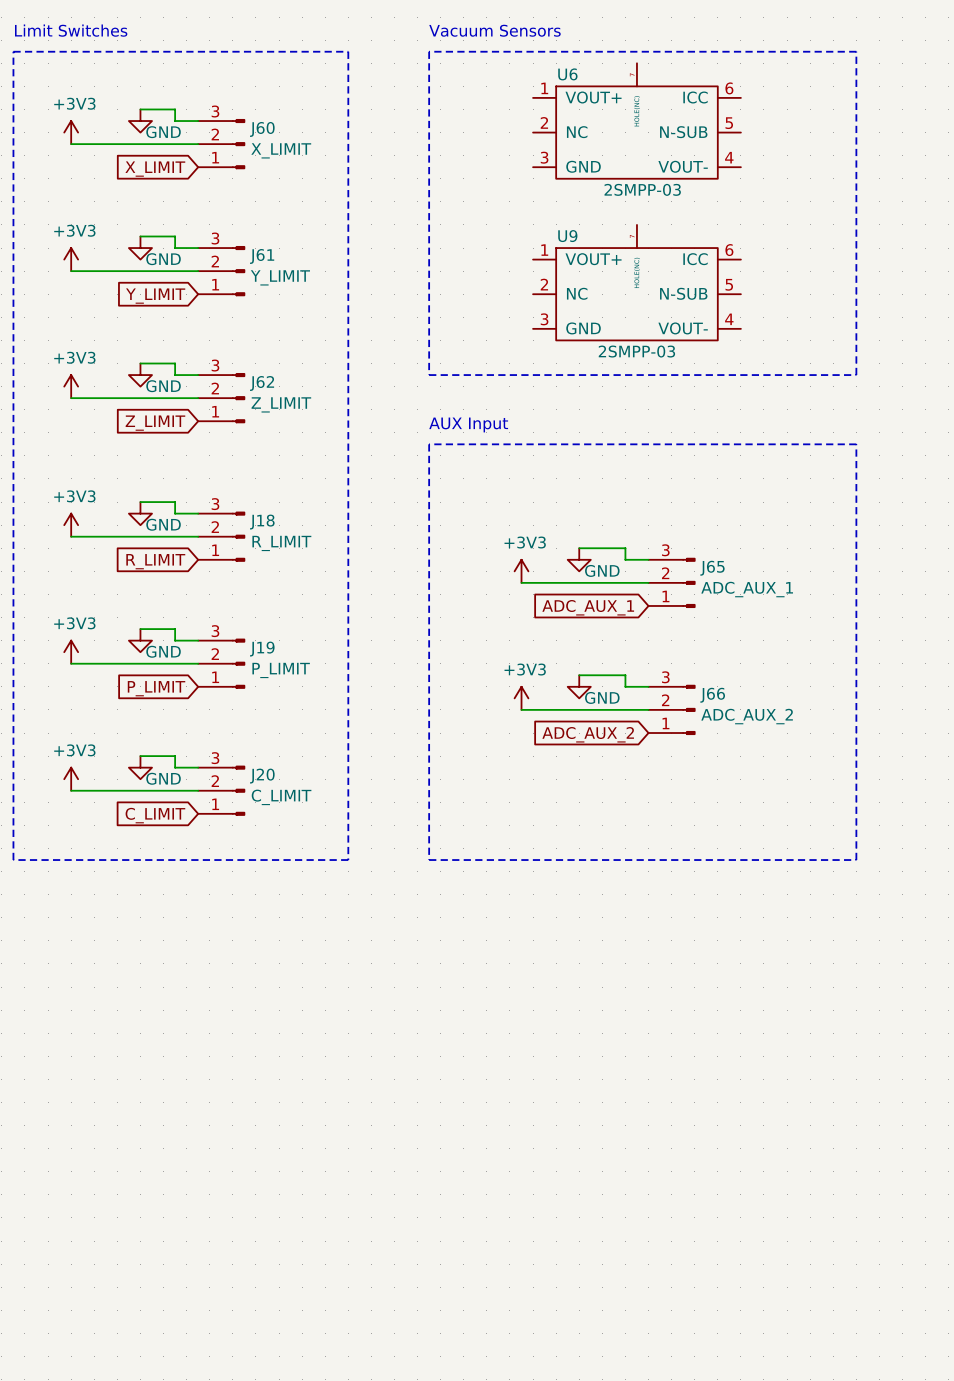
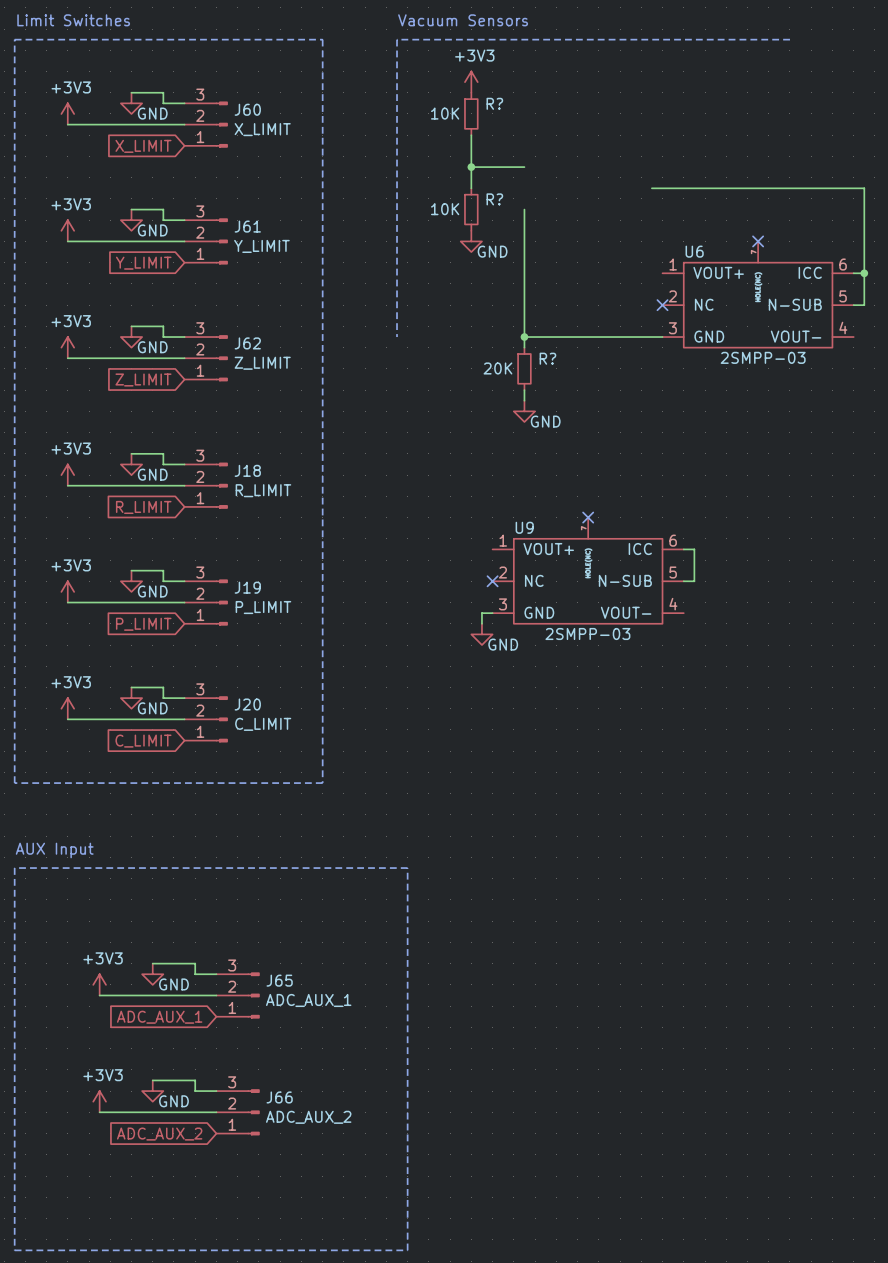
line: (856, 51) (856, 375) (429, 375) -> none
power symbol: none -> +3V3 (471, 82)
U6 position: (636, 121) -> (758, 294)
R?: none -> 10K (471, 113)
wire: none -> (471, 135) (471, 188)
wire: none -> (471, 167) (524, 167)
junction: none -> (471, 167)
wire: none -> (651, 188) (864, 188) (864, 305) (853, 305)
R?: none -> 10K (471, 209)
wire: none -> (524, 209) (524, 347)
power symbol: none -> GND (471, 241)
no-connect mark: none -> (758, 241)
U9 position: (636, 282) -> (588, 570)
wire: none -> (853, 273) (864, 273)
junction: none -> (864, 273)
no-connect mark: none -> (662, 305)
junction: none -> (524, 337)
R?: none -> 20K (524, 368)
text: AUX Input (468, 424) -> none
wire: none -> (524, 390) (524, 400)
line: (429, 444) (429, 860) (856, 860) (856, 444) (429, 444) -> none
wire: (579, 548) (625, 548) (625, 559) (648, 559) -> none
power symbol position: GND (579, 559) -> GND (524, 411)
power symbol: +3V3 (521, 571) -> none
no-connect mark: none -> (588, 517)
wire: (521, 582) (648, 582) -> none
J65 position: (671, 582) -> (238, 995)
wire: none -> (683, 549) (694, 549) (694, 581) (683, 581)
global label: ADC_AUX_1 (588, 607) -> none
no-connect mark: none -> (492, 581)
wire: none -> (492, 613) (481, 613) (481, 623)
wire: (579, 675) (625, 675) (625, 686) (648, 686) -> none
power symbol: GND (579, 686) -> none
power symbol: +3V3 (521, 698) -> GND (481, 634)
wire: (521, 709) (648, 709) -> none
J66 position: (671, 709) -> (238, 1112)
global label: ADC_AUX_2 (588, 734) -> none
text: none -> AUX Input (54, 850)
line: none -> (14, 868) (14, 1250) (407, 1250) (407, 868) (14, 868)
wire: none -> (152, 963) (195, 963) (195, 974) (216, 974)
power symbol: none -> GND (152, 974)
power symbol: none -> +3V3 (99, 984)
wire: none -> (99, 995) (216, 995)
global label: none -> ADC_AUX_1 (159, 1017)
wire: none -> (152, 1080) (195, 1080) (195, 1091) (216, 1091)
power symbol: none -> GND (152, 1091)
power symbol: none -> +3V3 (99, 1101)
wire: none -> (99, 1112) (216, 1112)
global label: none -> ADC_AUX_2 (159, 1134)

